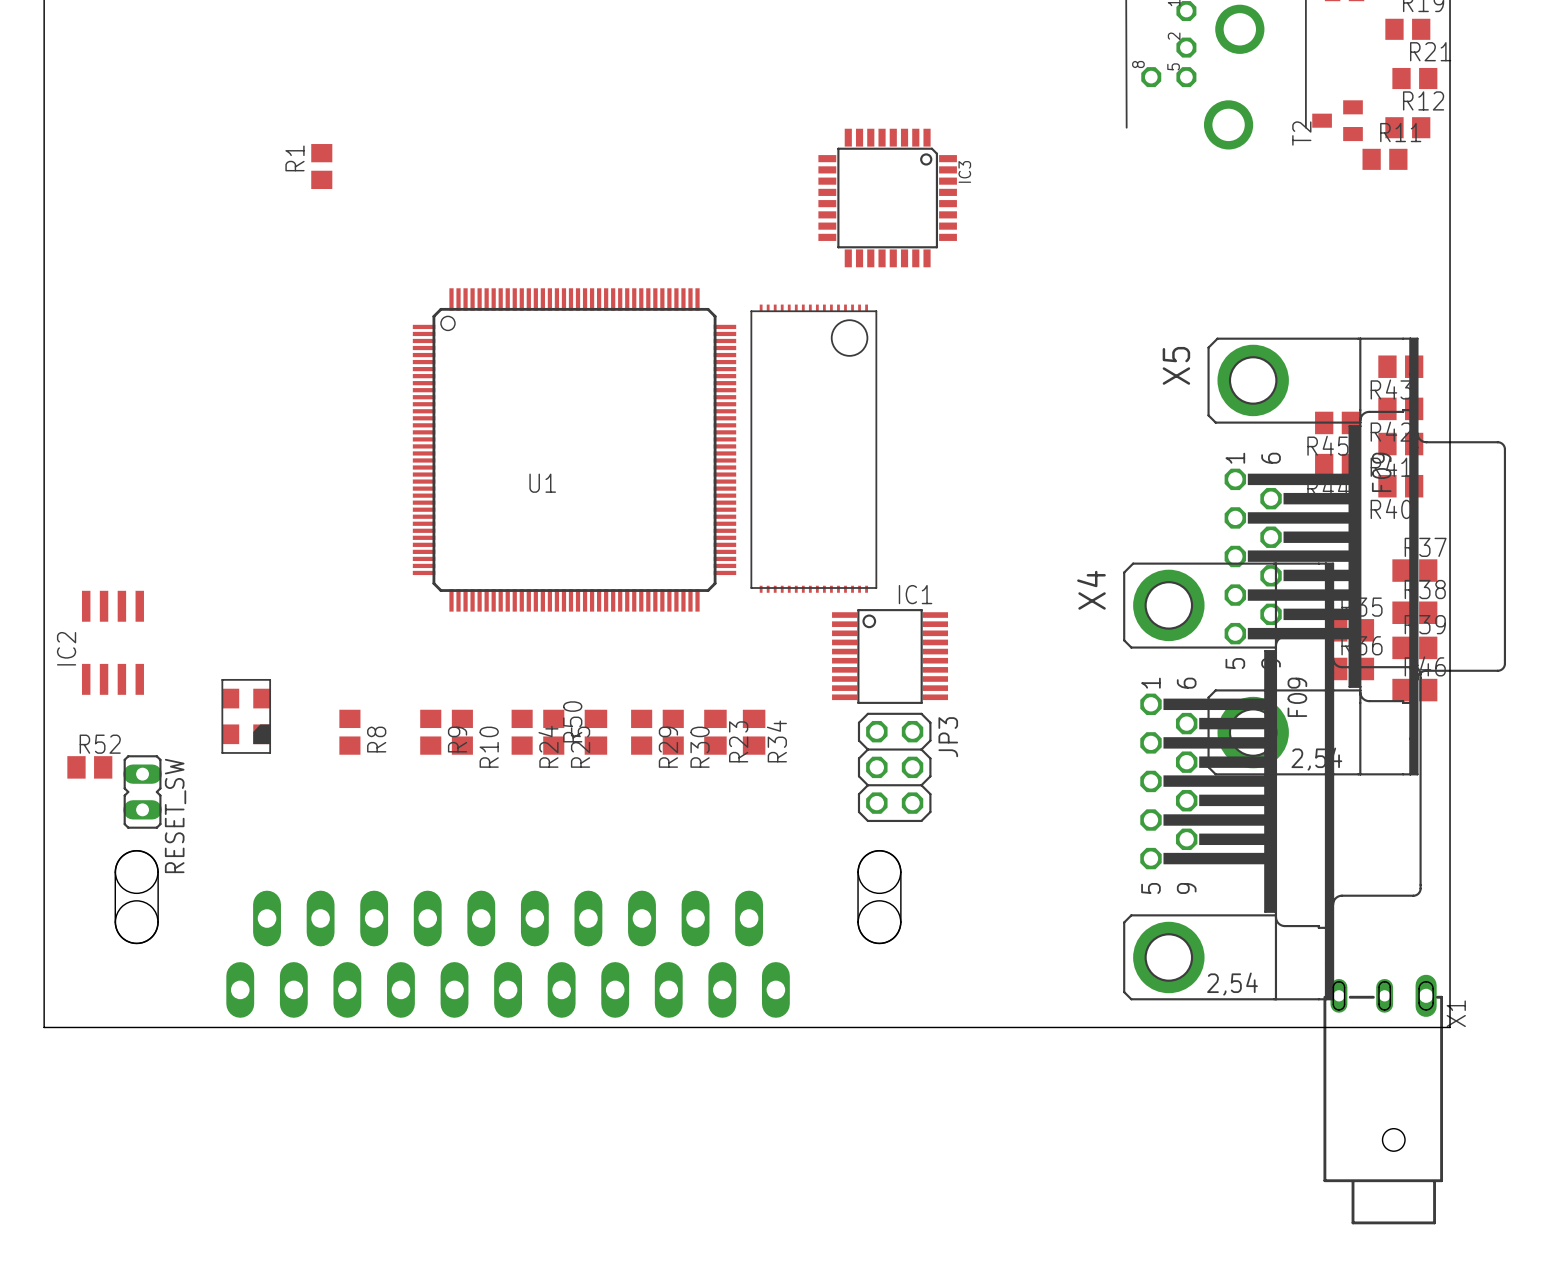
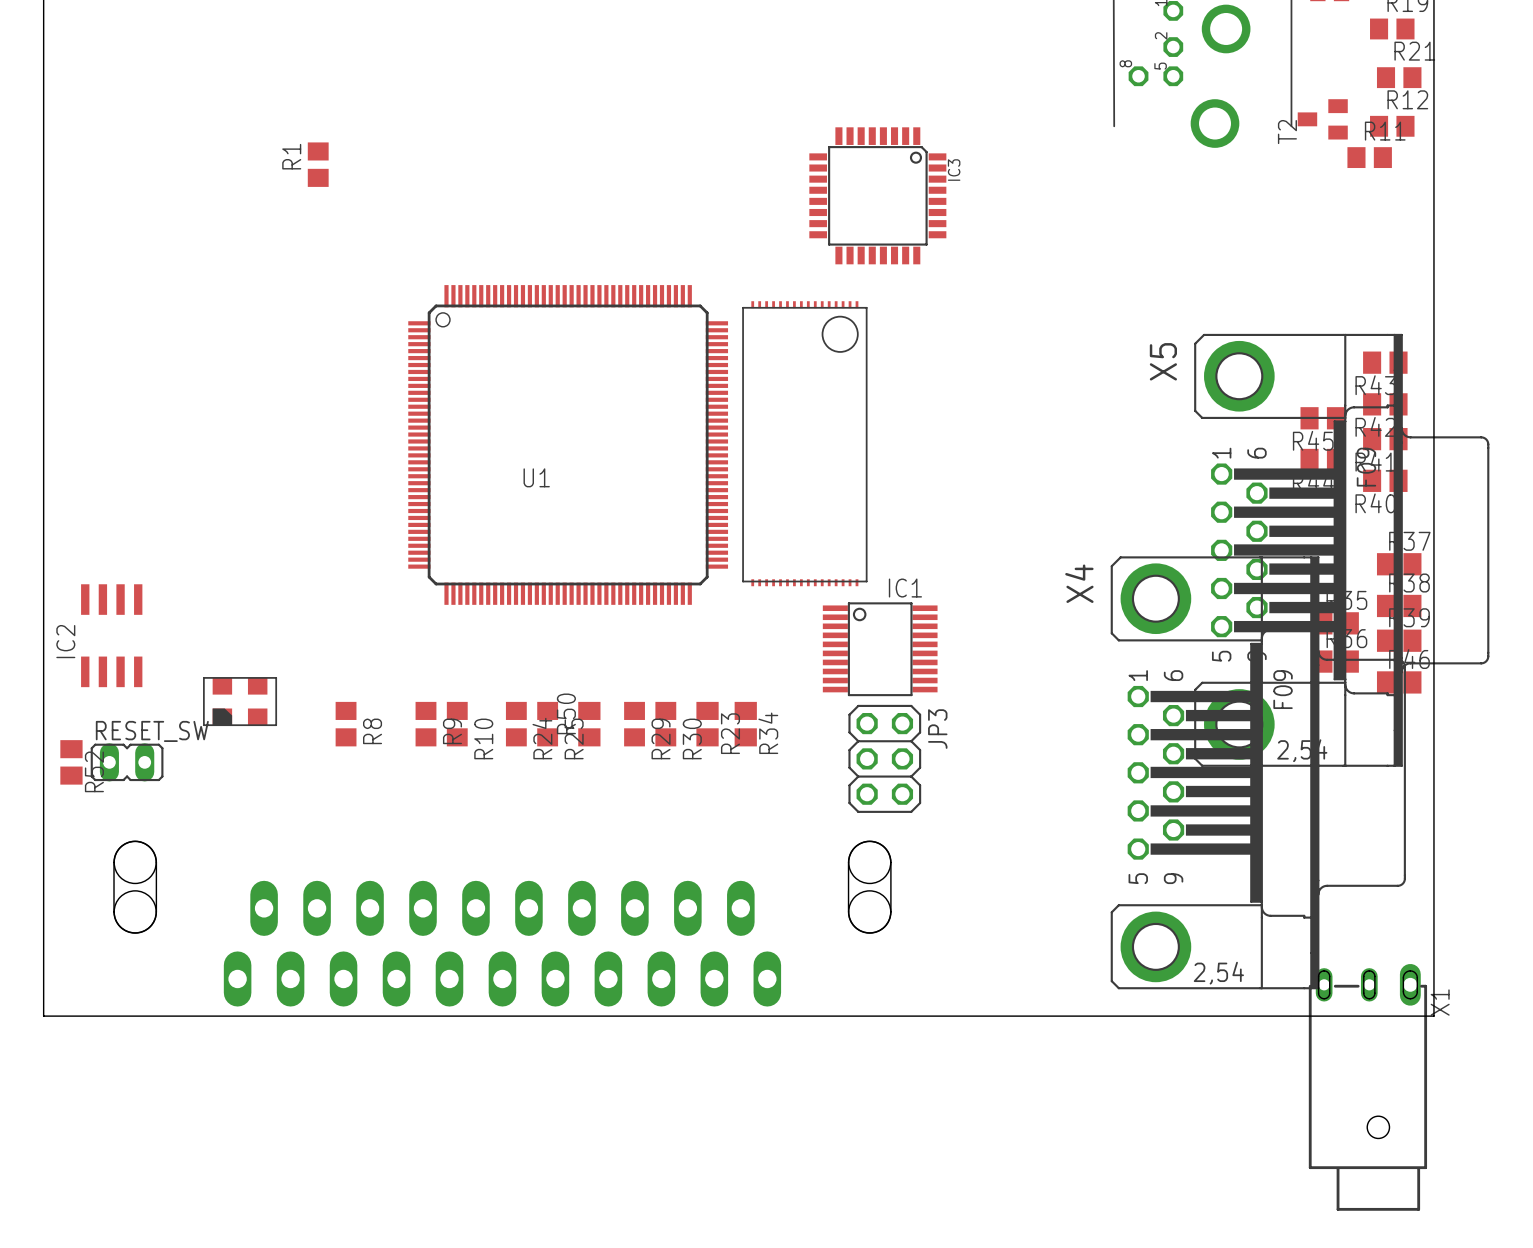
part rotation: 0° (246, 716) -> 90° clockwise (240, 701)
R52 rotation: 0° (89, 767) -> 90° clockwise (71, 762)
RESET_SW rotation: 0° (142, 791) -> 90° clockwise (127, 762)
RESET_SW name position: RESET_SW (175, 815) -> RESET_SW (152, 731)

